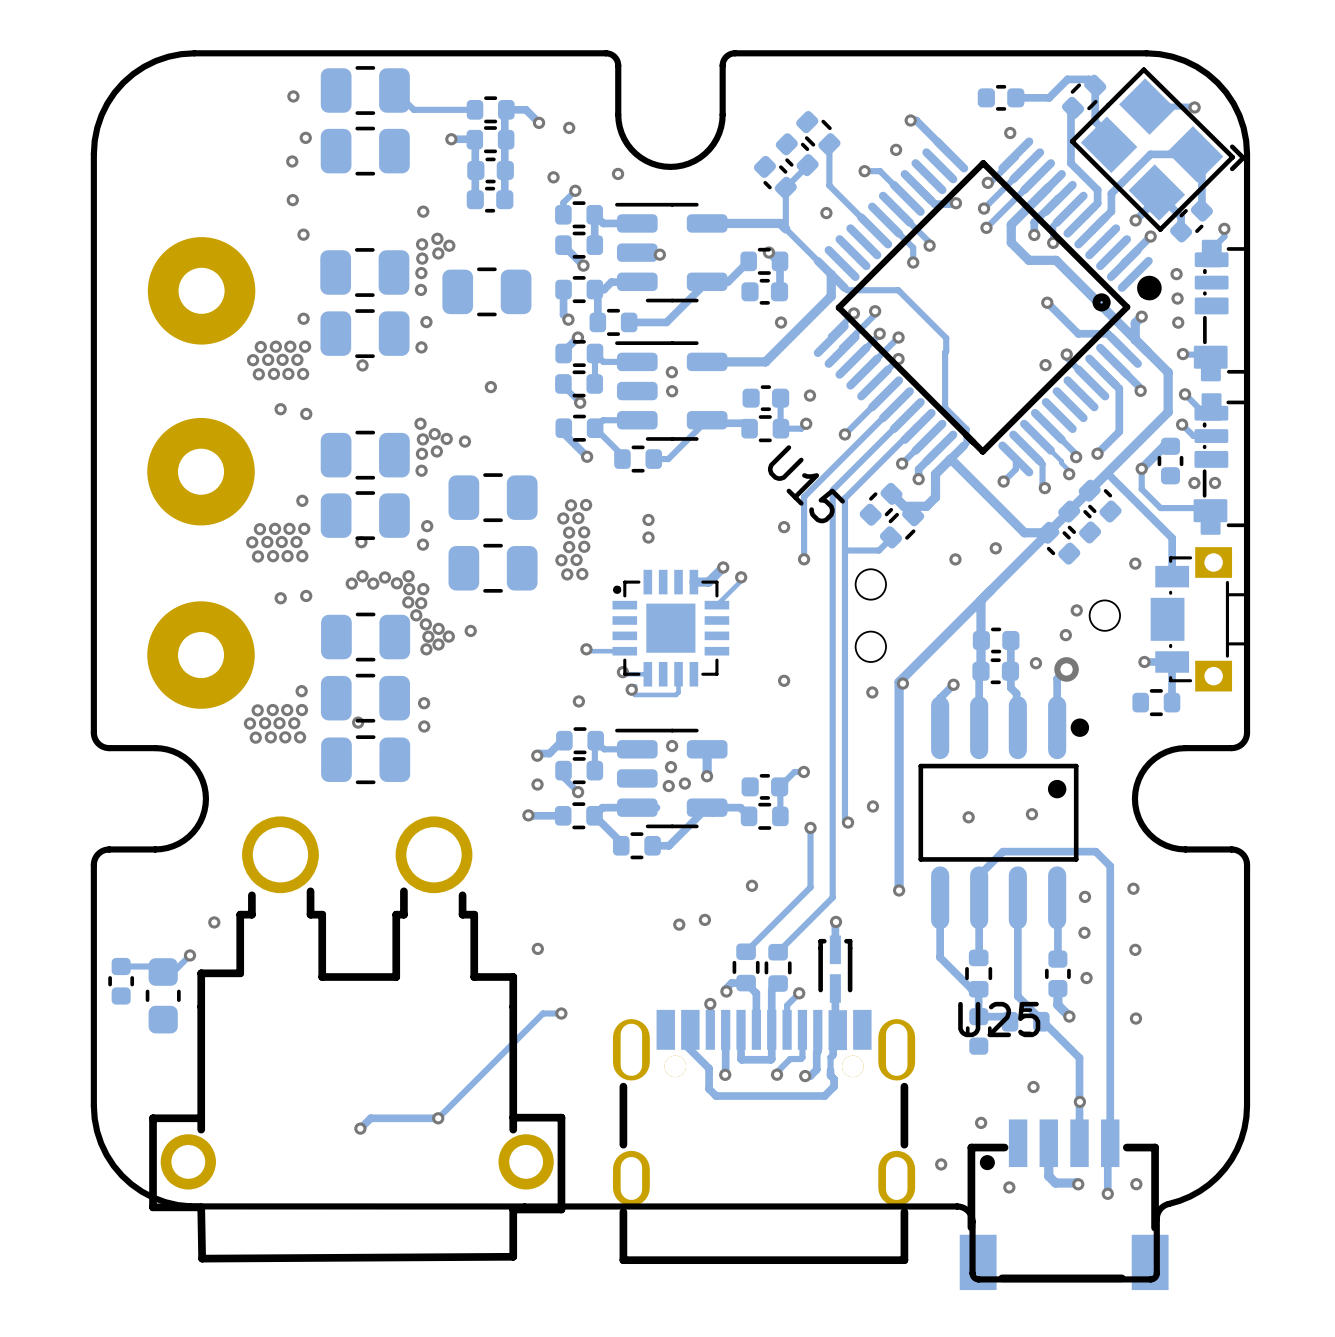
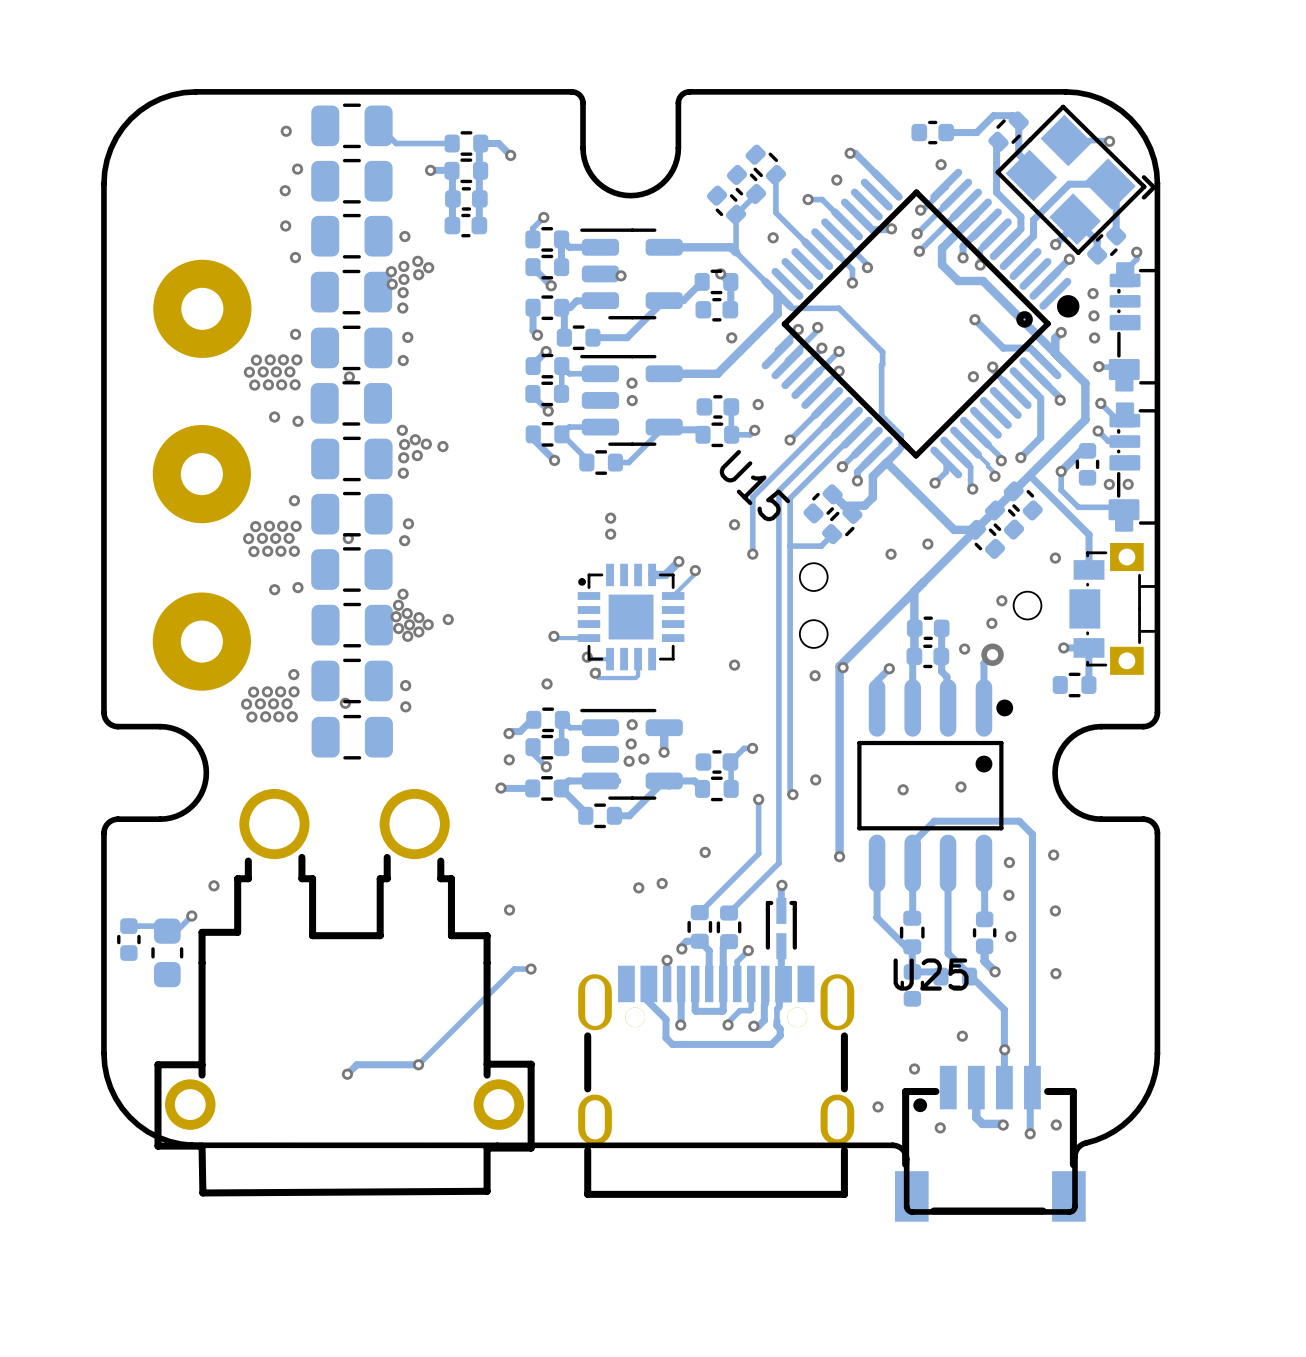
via: (569, 127) -> none
via: (618, 173) -> none
via: (553, 177) -> none
part: none -> (351, 236)
via: none -> (391, 271)
via: none -> (392, 284)
part: (486, 291) -> none
via: (490, 387) -> none
part: none -> (351, 403)
part: (493, 497) -> none
via: (571, 505) -> none
via: (586, 505) -> none
via: (563, 518) -> none
via: (578, 518) -> none
via: (569, 532) -> none
via: (584, 532) -> none
via: (584, 546) -> none
via: (569, 547) -> none
via: (576, 559) -> none
via: (561, 560) -> none
part: (493, 568) -> none
via: (567, 574) -> none
via: (582, 574) -> none
via: (362, 576) -> none
part: none -> (351, 569)
via: (408, 576) -> none
via: (384, 577) -> none
via: (351, 583) -> none
via: (373, 583) -> none
via: (396, 583) -> none
via: (409, 589) -> none
via: (423, 589) -> none
via: (408, 602) -> none
via: none -> (396, 616)
via: none -> (398, 628)

